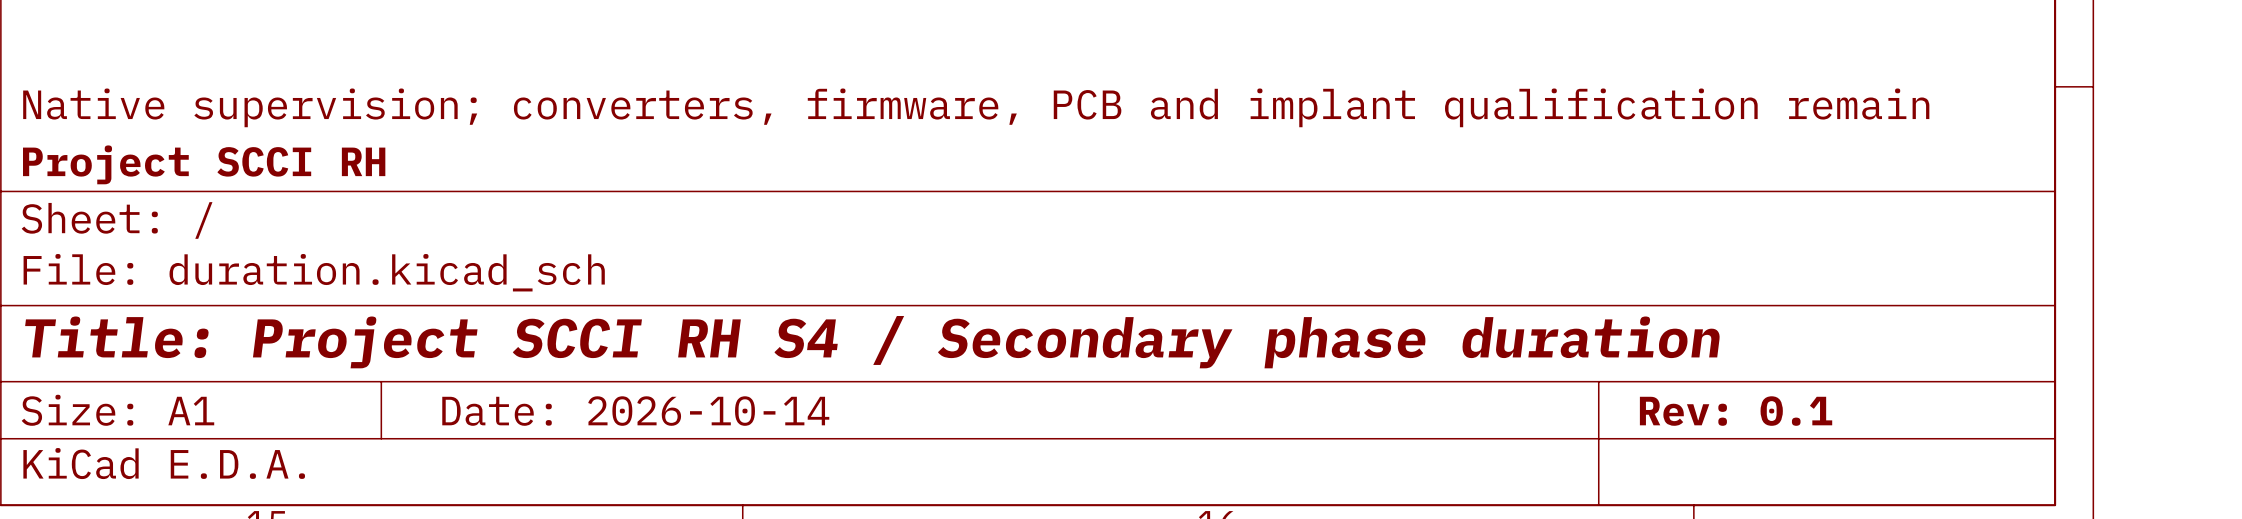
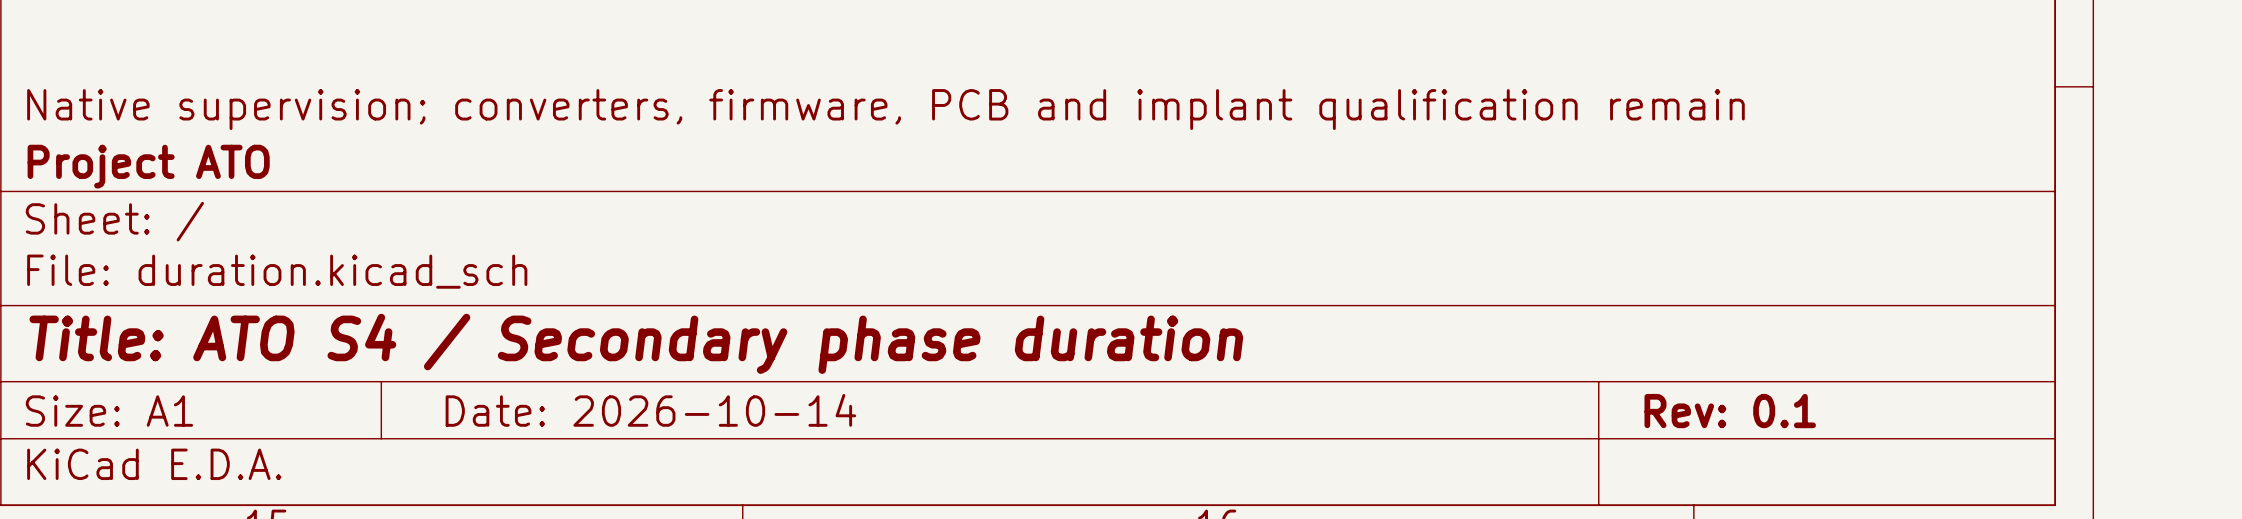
title block: Project SCCI RH (204, 164) -> Project ATO (148, 166)
title block: Title: Project SCCI RH S4 / Secondary phase duration (872, 342) -> Title: ATO S4 / Secondary phase duration (636, 343)

